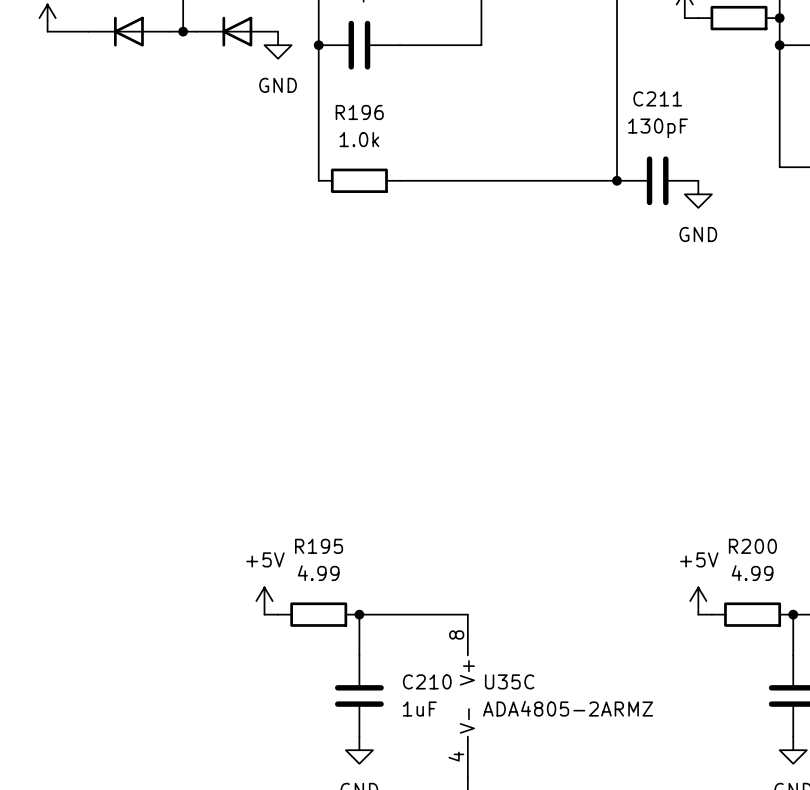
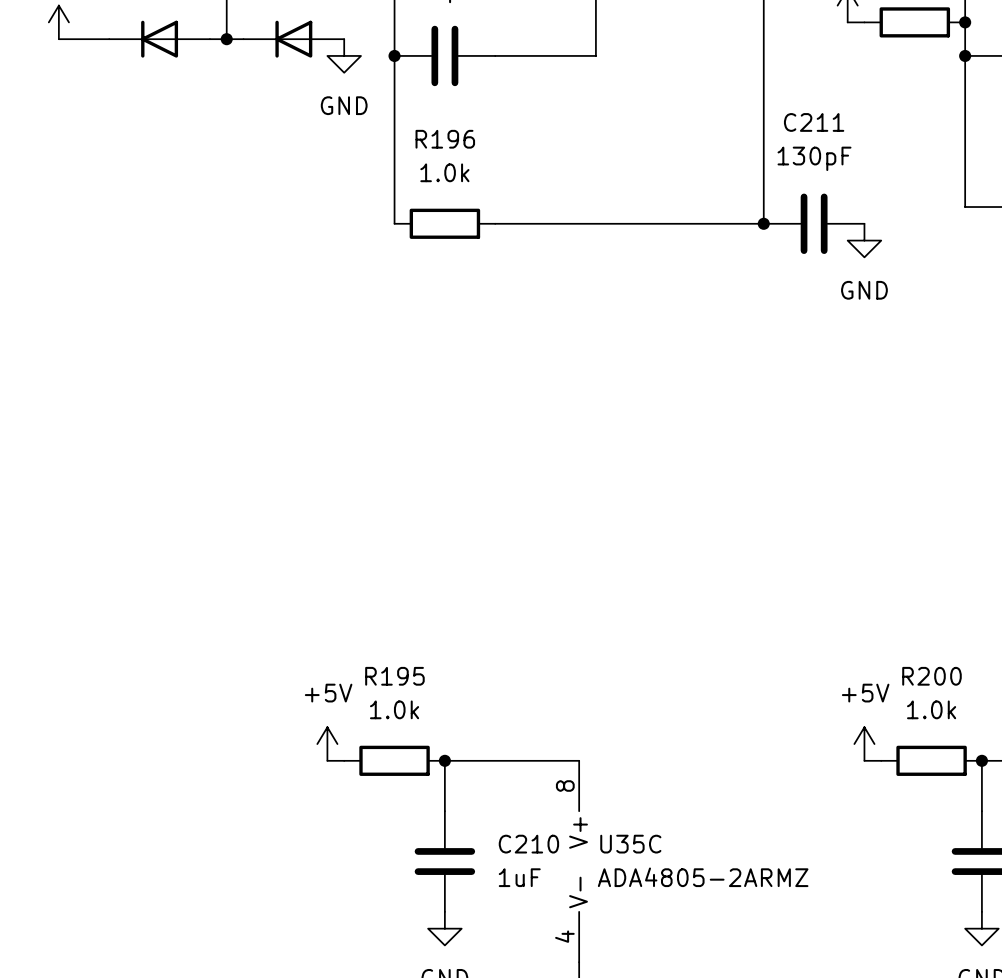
R195 value: 4.99 (318, 573) -> 1.0k (394, 709)
R200 value: 4.99 (752, 573) -> 1.0k (931, 709)

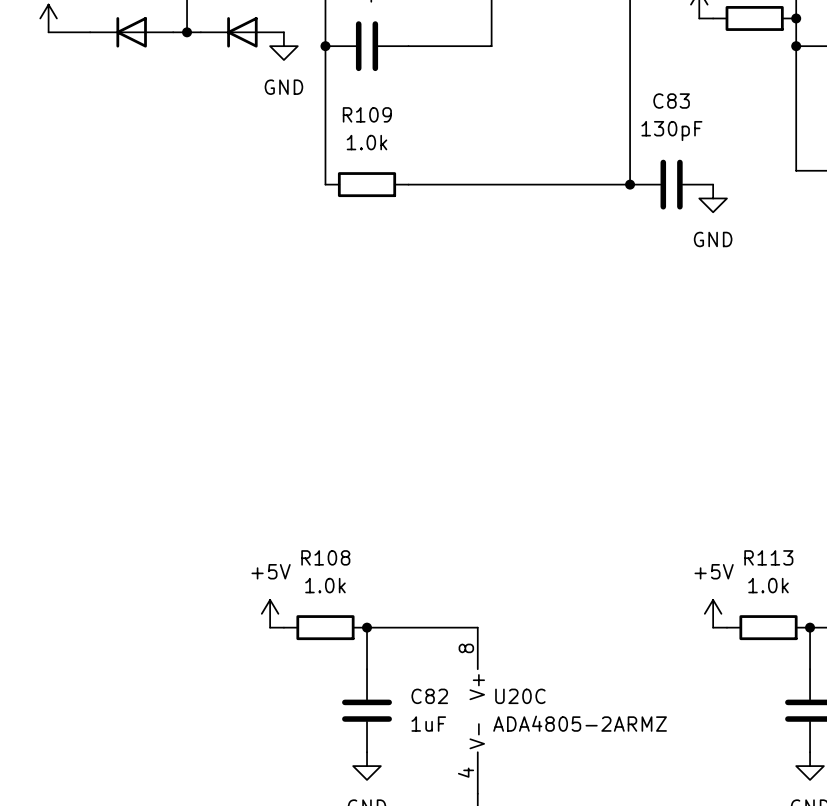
C211 name: C211 (814, 122) -> C83 (671, 101)
R196 name: R196 (445, 139) -> R109 (367, 114)
R195 name: R195 (394, 676) -> R108 (325, 557)
R200 name: R200 (931, 676) -> R113 (768, 557)
C210 name: C210 (528, 844) -> C82 (429, 696)
U35C name: U35C (630, 844) -> U20C (520, 696)

